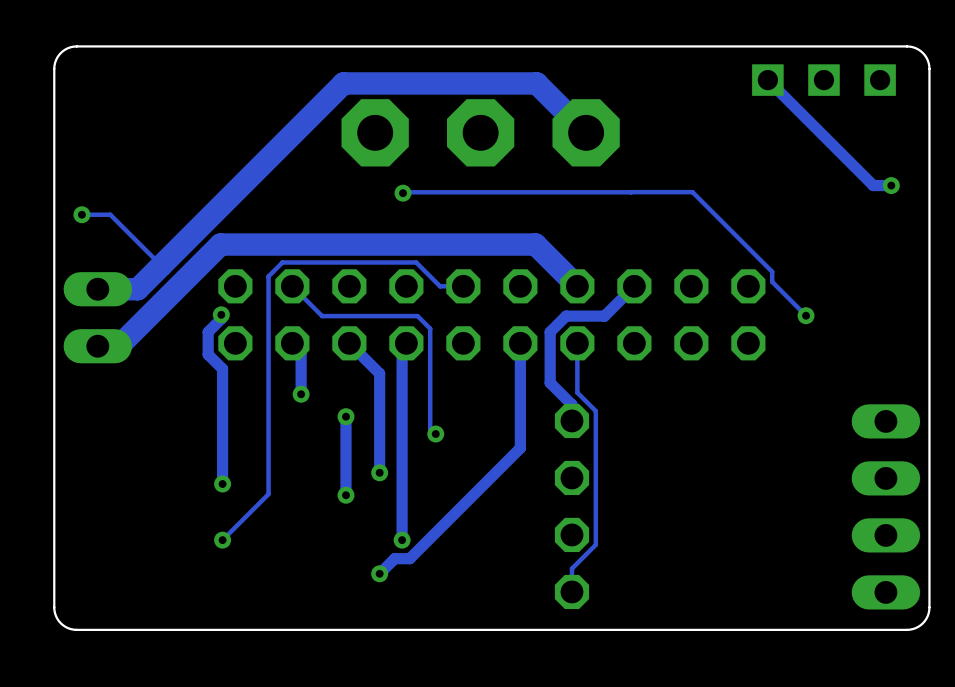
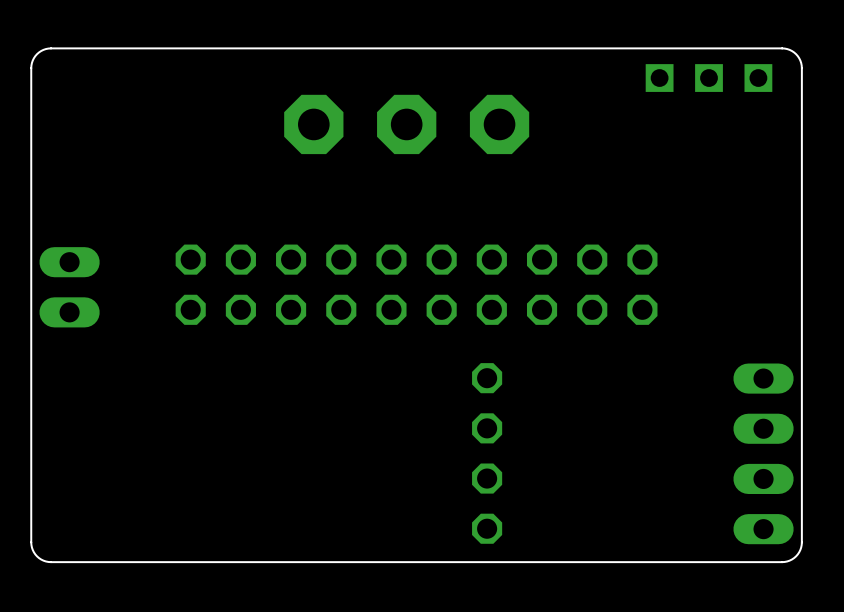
track: (767, 80) (873, 185) (891, 185) -> none
track: (586, 132) (536, 83) (343, 83) (137, 289) (97, 289) -> none
via: (891, 185) -> none
track: (631, 192) (692, 192) (772, 271) (772, 281) (806, 315) -> none
track: (631, 192) (402, 193) -> none
via: (402, 193) -> none
track: (81, 214) (110, 214) (161, 265) -> none
via: (81, 214) -> none
track: (292, 286) (322, 316) (417, 316) (430, 328) (430, 428) (435, 434) -> none
track: (463, 286) (440, 286) (416, 262) (282, 262) (268, 276) (268, 494) (222, 540) -> none
track: (577, 286) (535, 244) (220, 244) (118, 346) (97, 346) -> none
track: (634, 286) (604, 316) (566, 316) (550, 332) (550, 382) (571, 404) (571, 420) -> none
track: (221, 314) (221, 318) (208, 332) (208, 354) (222, 368) (222, 484) -> none
via: (221, 314) -> none
via: (806, 315) -> none
track: (292, 343) (301, 352) (301, 394) -> none
track: (349, 343) (379, 373) (379, 472) -> none
track: (406, 343) (402, 347) (402, 540) -> none
track: (520, 343) (520, 448) (409, 558) (394, 558) (379, 573) -> none
track: (577, 343) (577, 392) (595, 411) (595, 544) (571, 568) (571, 591) -> none
via: (301, 394) -> none
track: (346, 416) (346, 495) -> none
via: (346, 416) -> none
via: (435, 434) -> none
via: (379, 472) -> none
via: (222, 484) -> none
via: (346, 495) -> none
via: (222, 540) -> none
via: (402, 540) -> none
via: (379, 573) -> none

